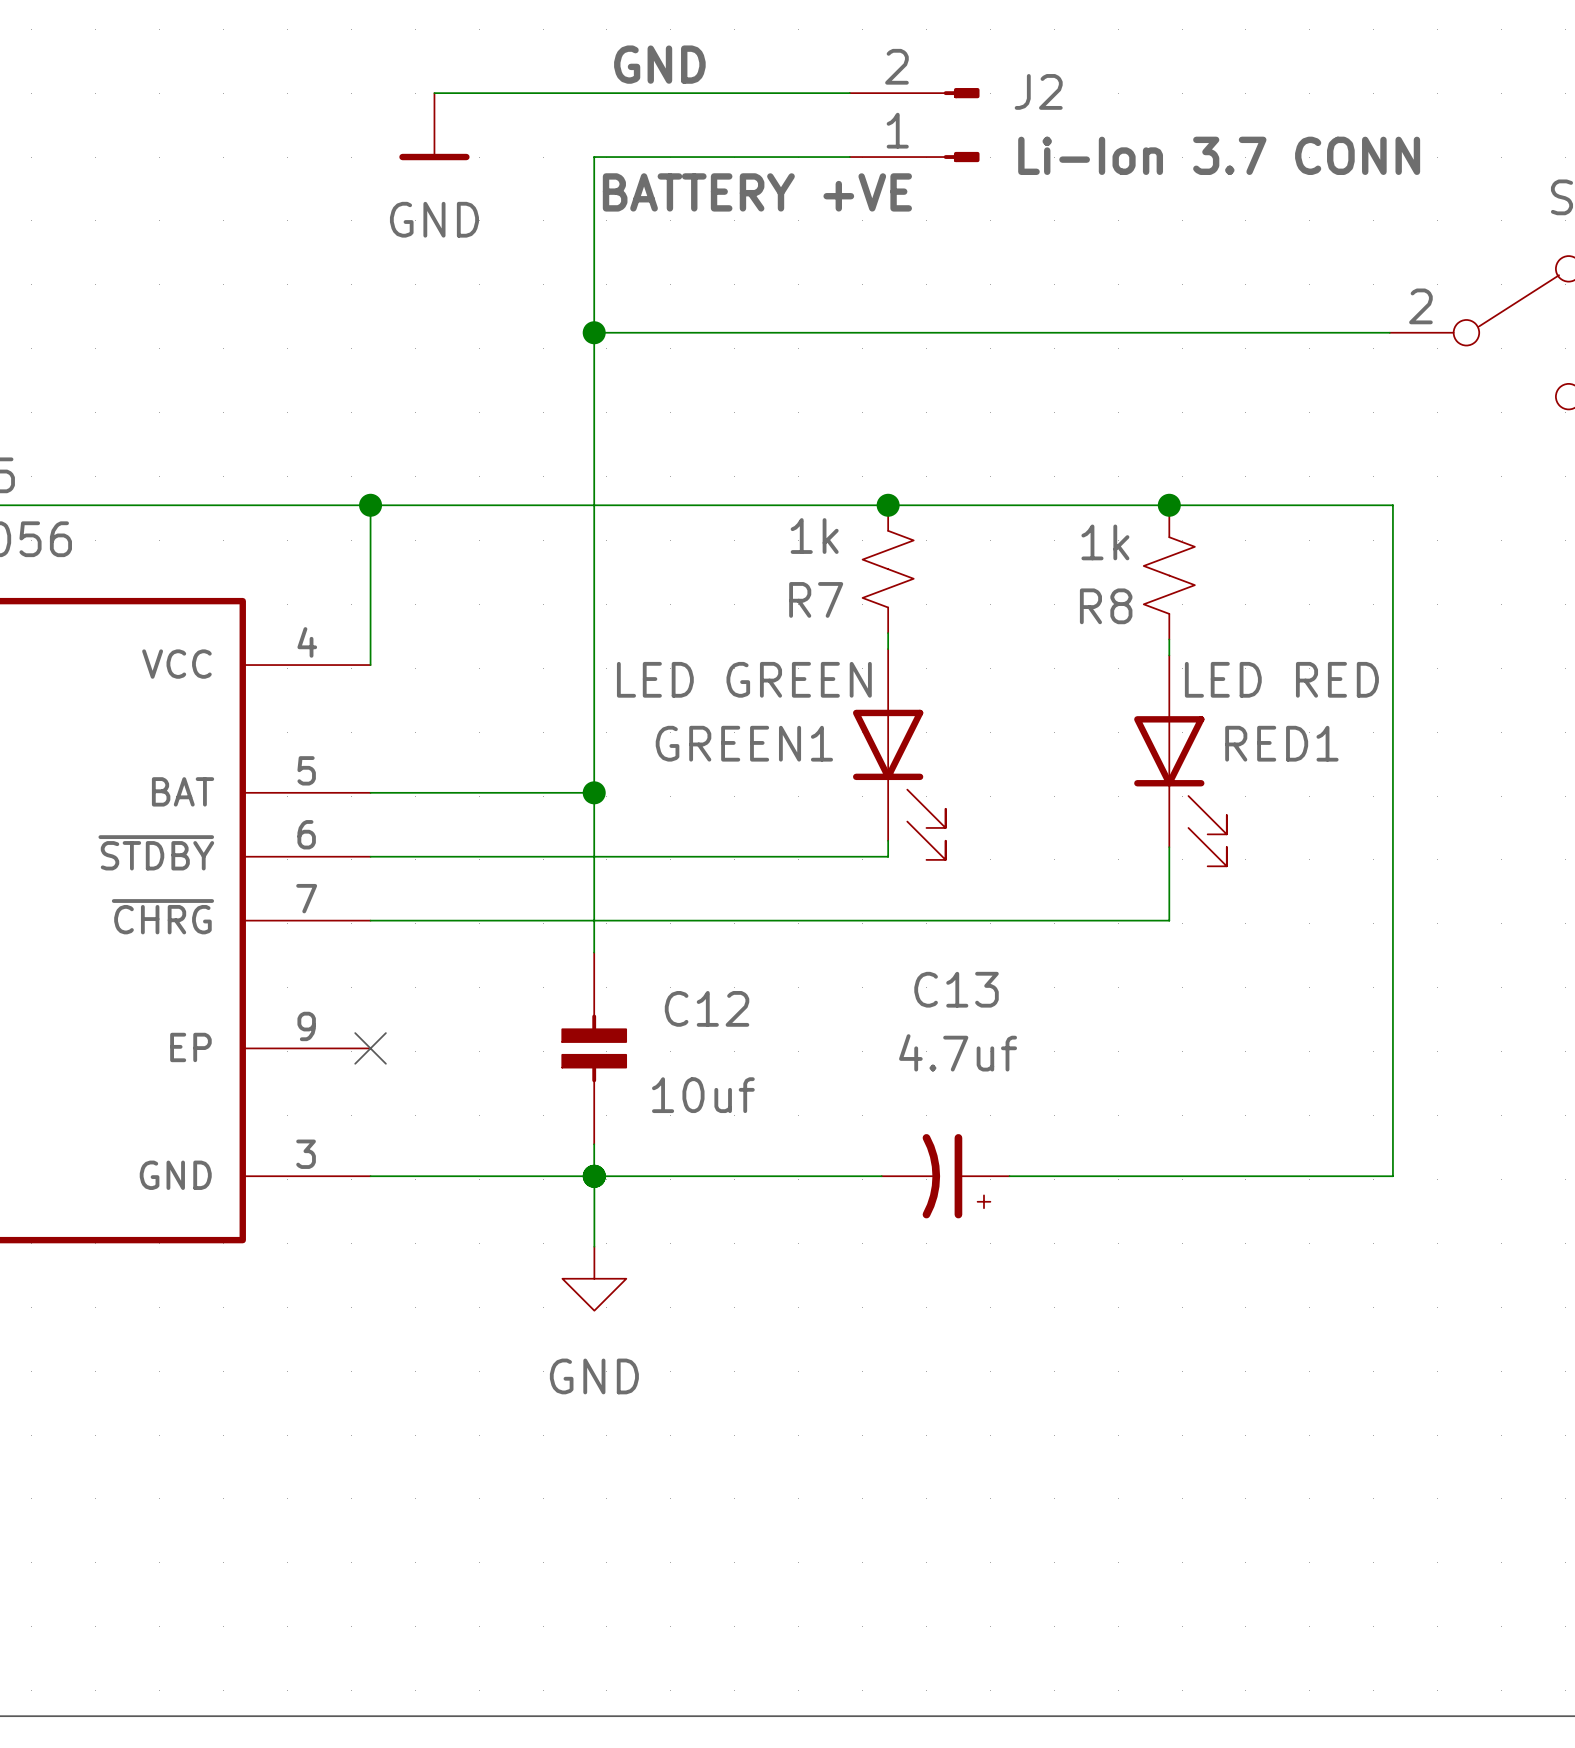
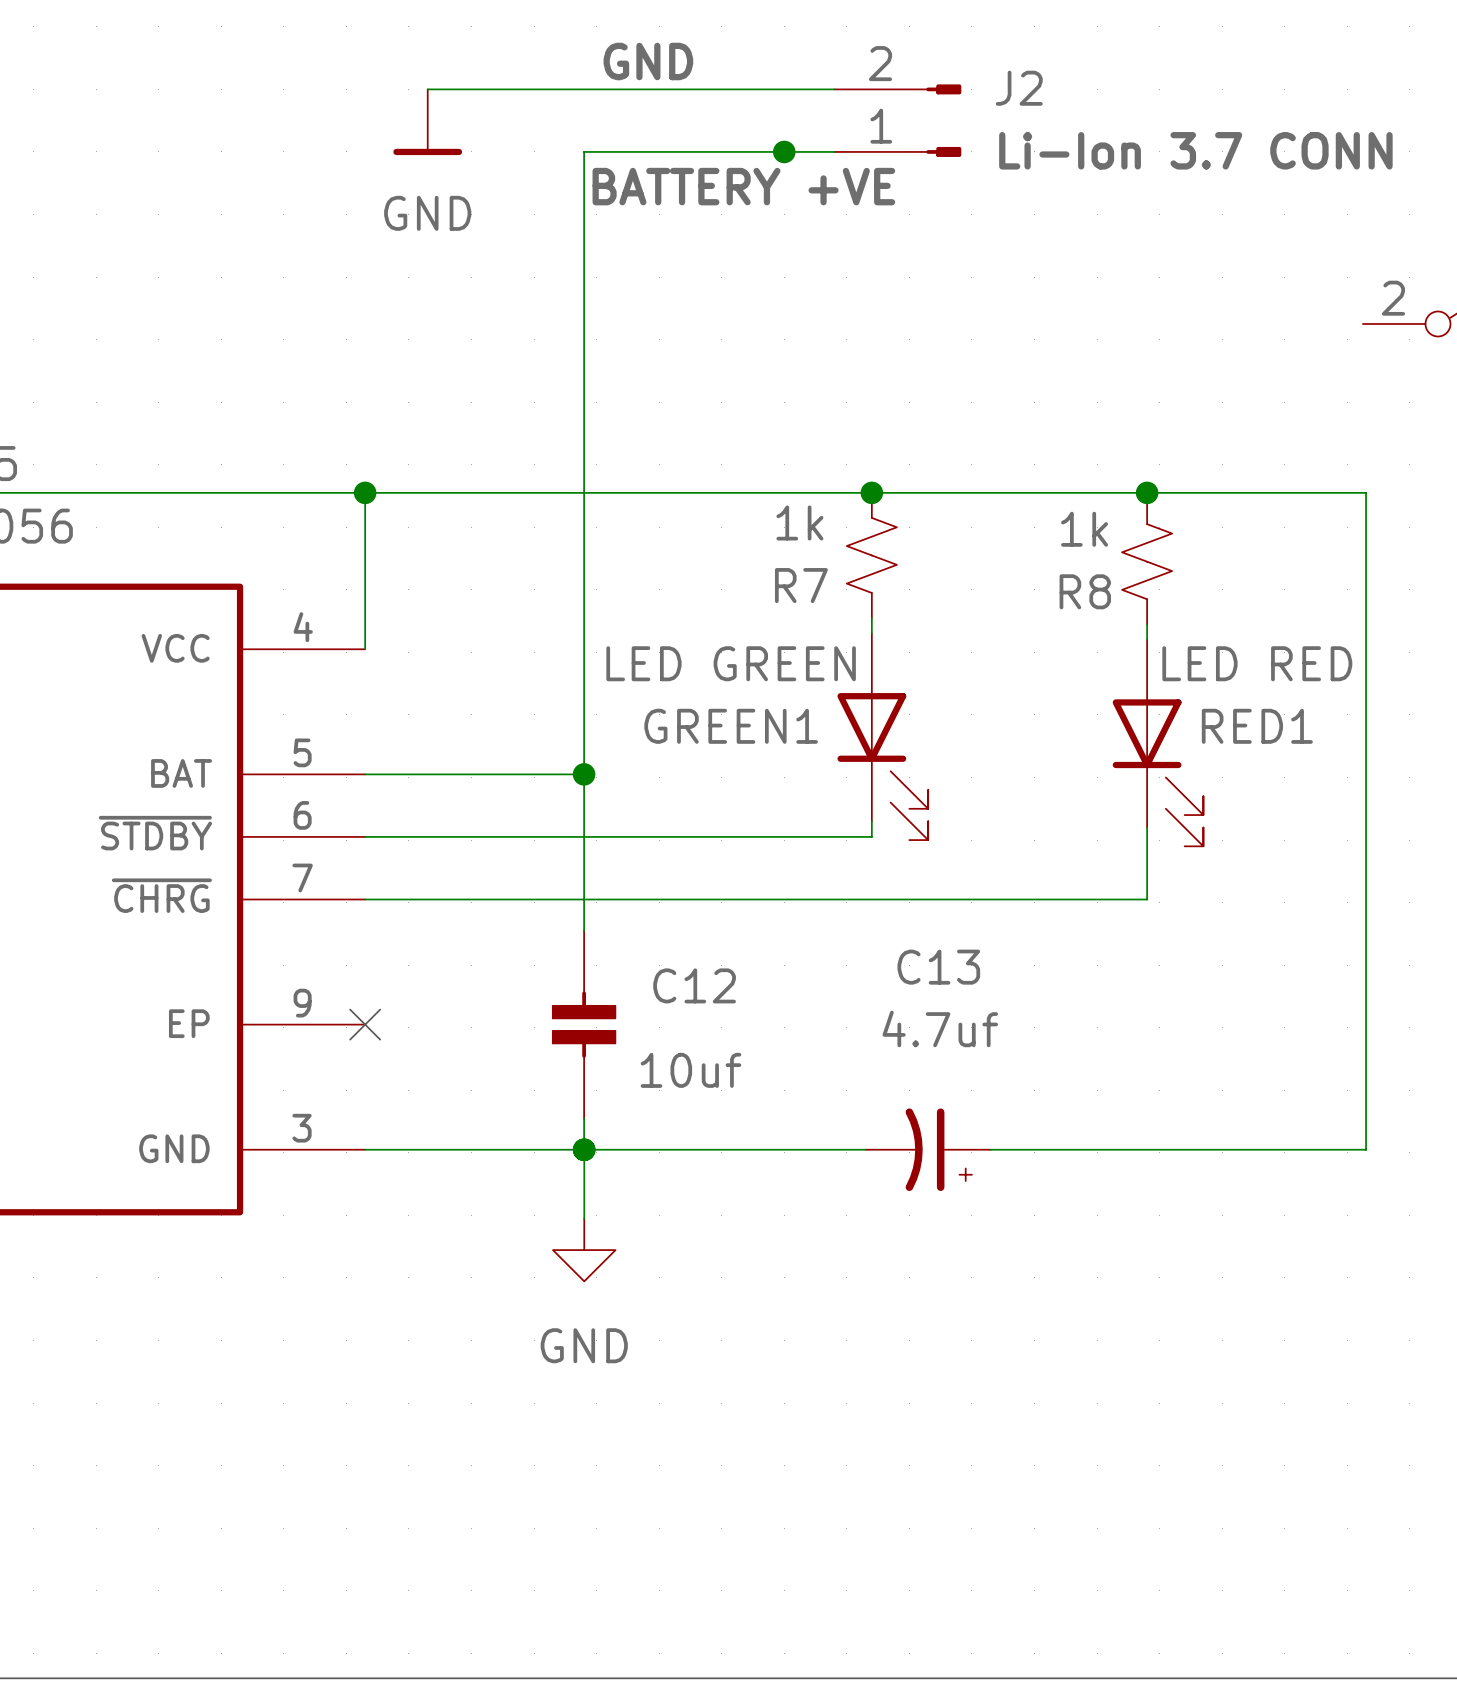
junction: none -> (784, 151)
wire: (594, 332) (1389, 332) -> none
junction: (594, 332) -> none

